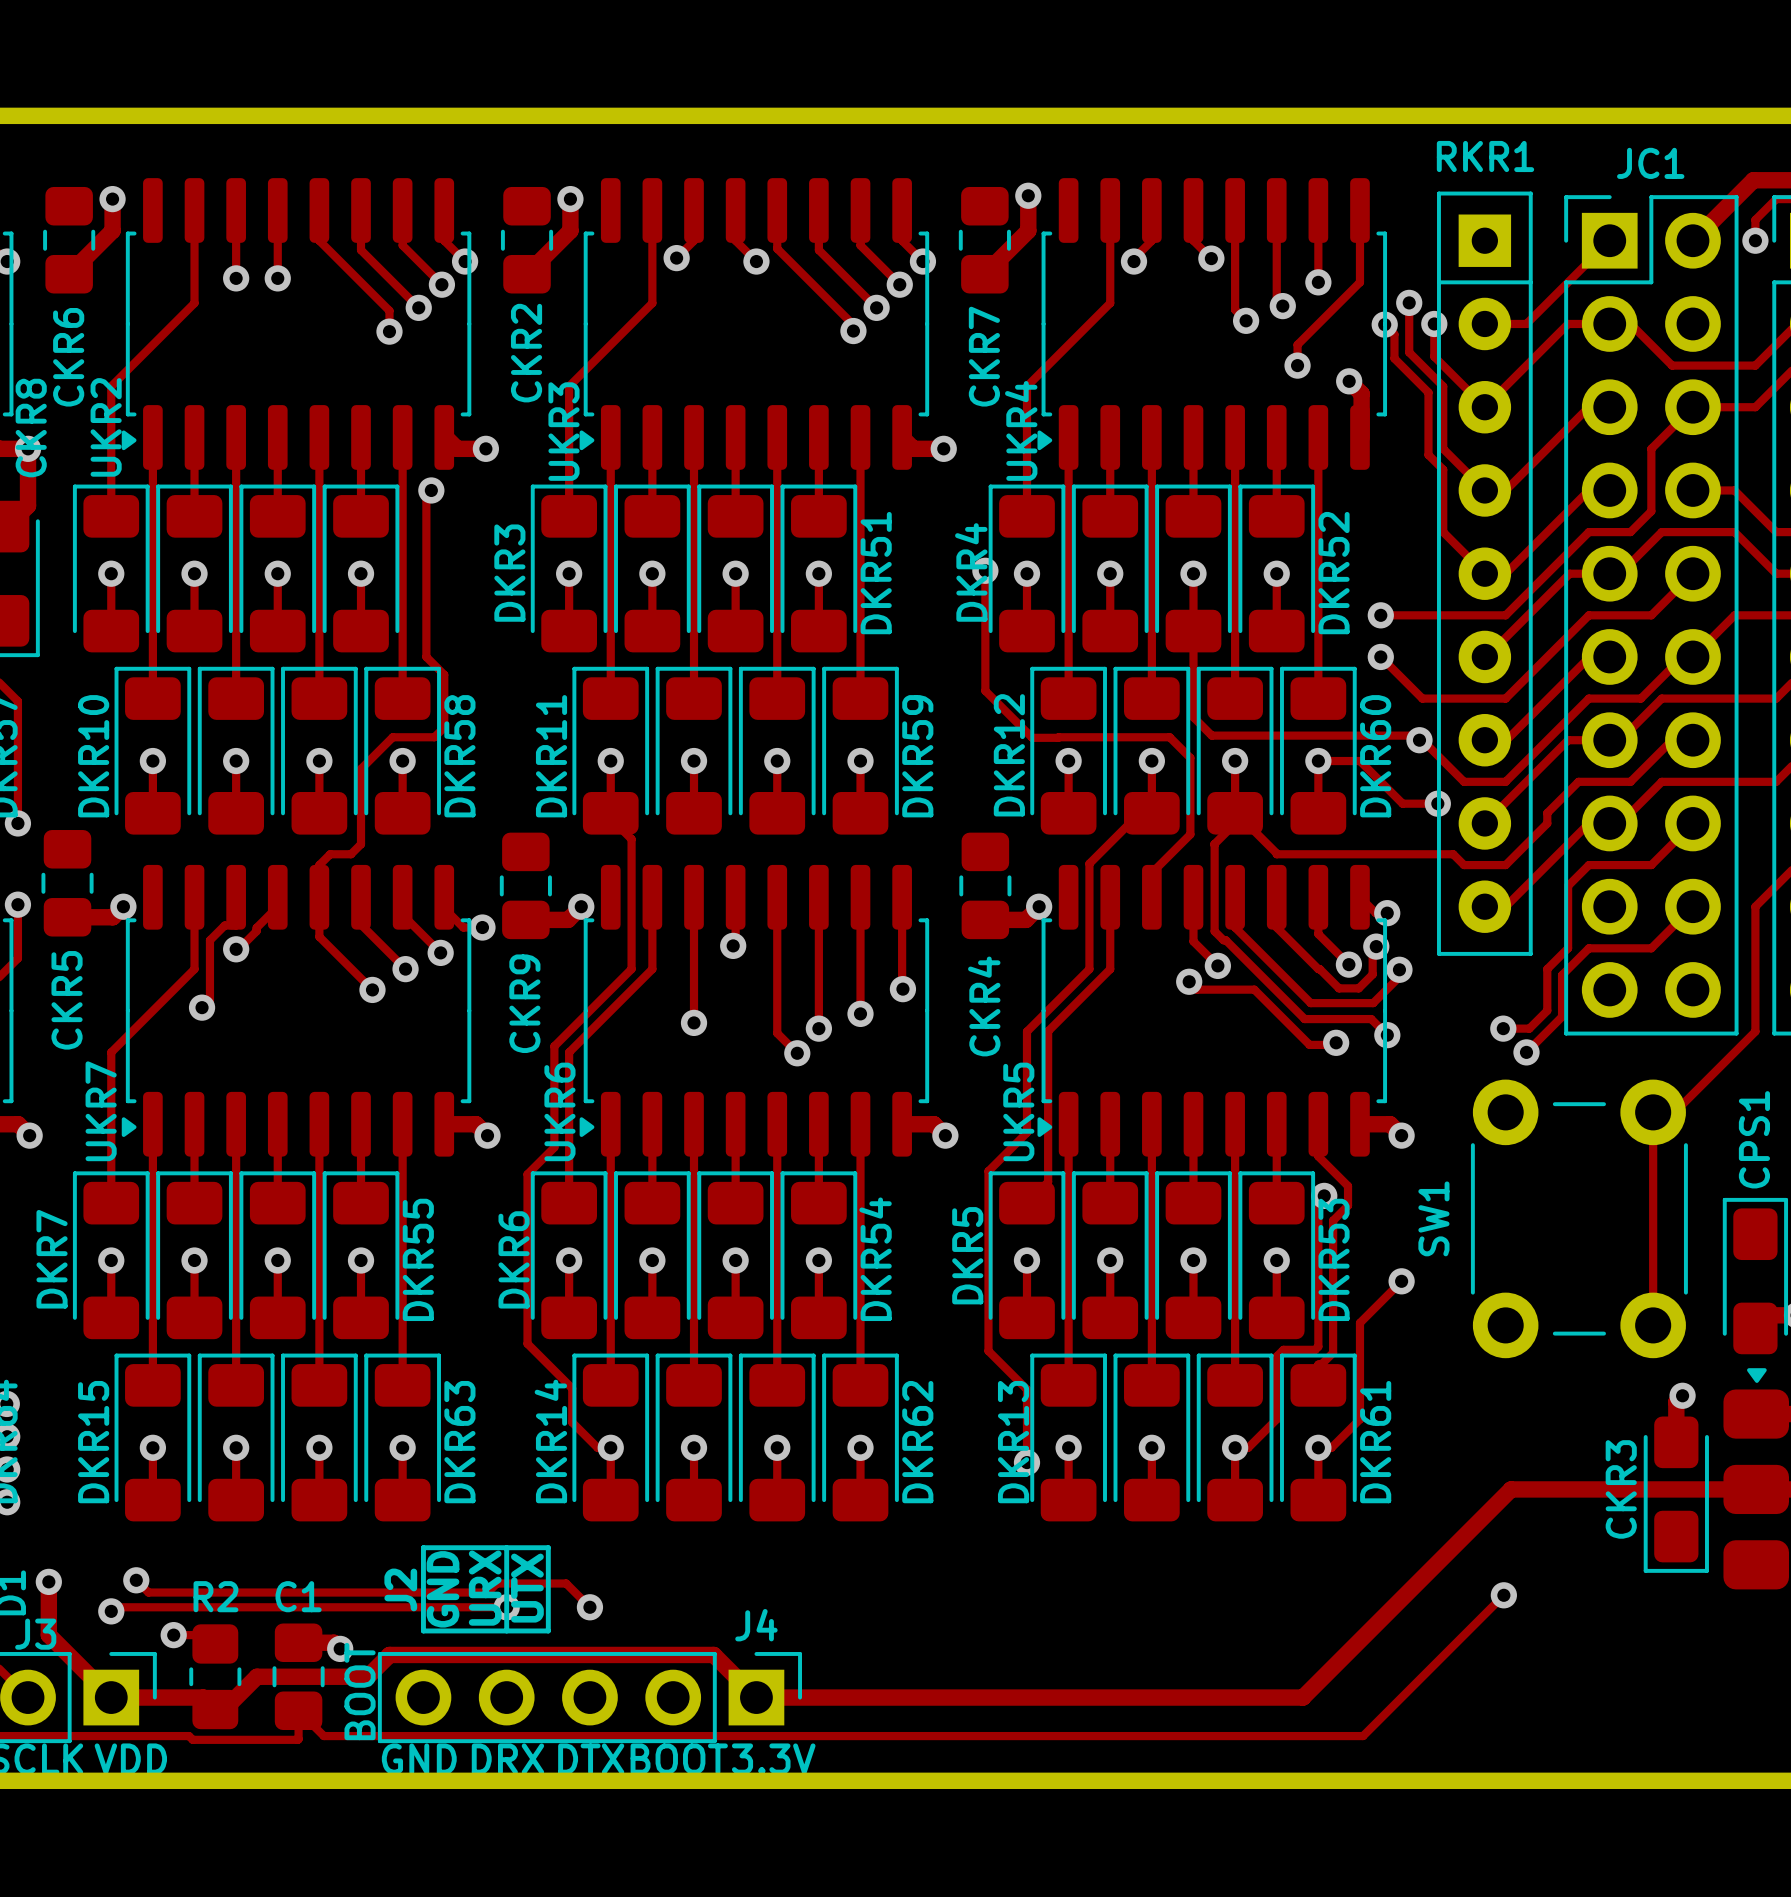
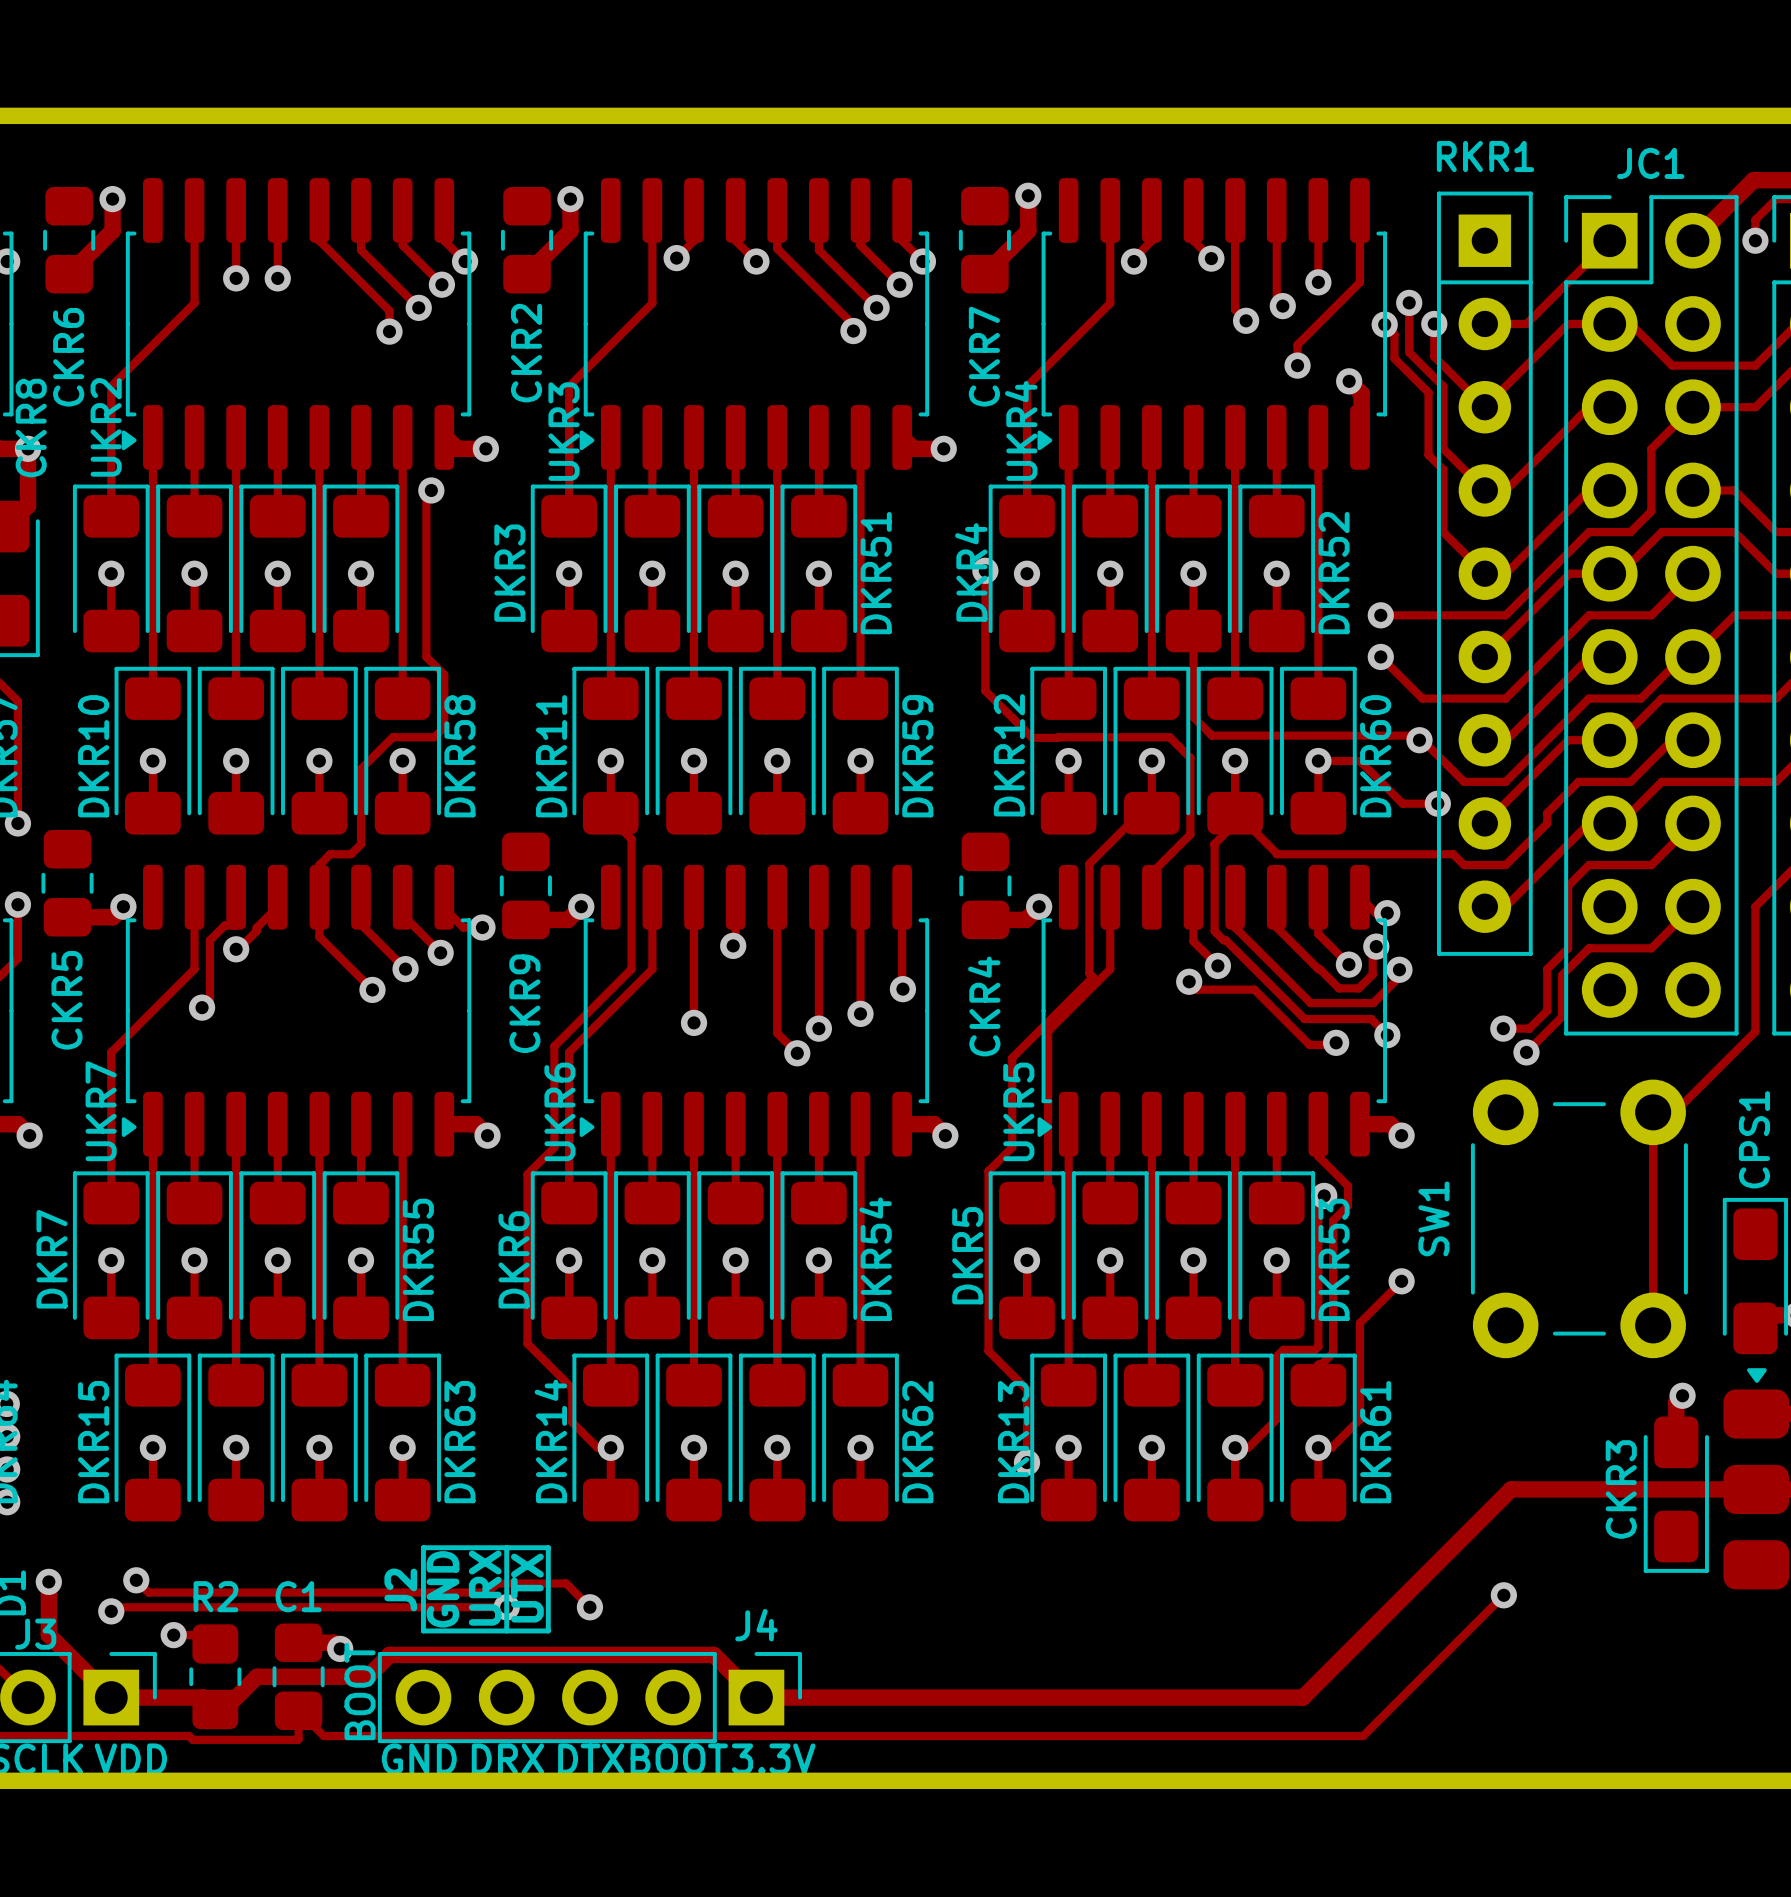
track: (1089, 969) (1027, 1031) (1027, 1132) (1012, 1147) -> (1089, 969) (1089, 973) (1092, 977) (1012, 1057) (1012, 1147)

